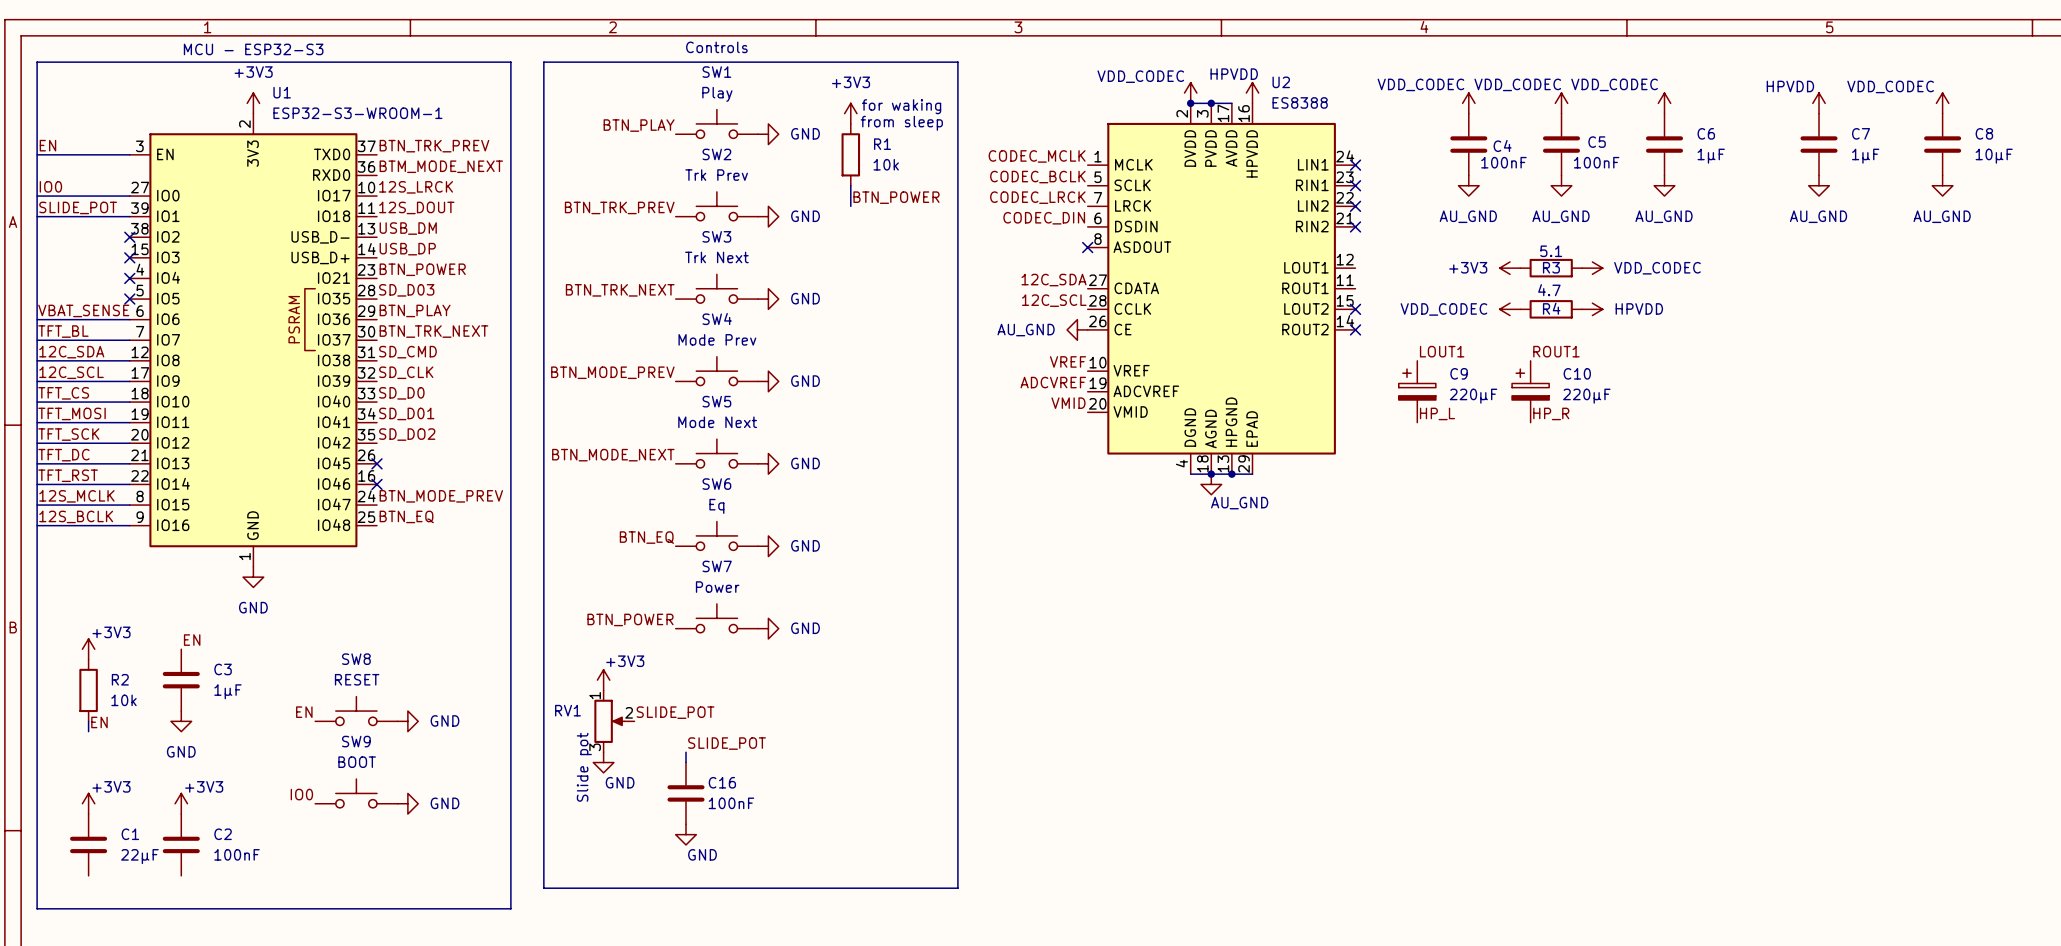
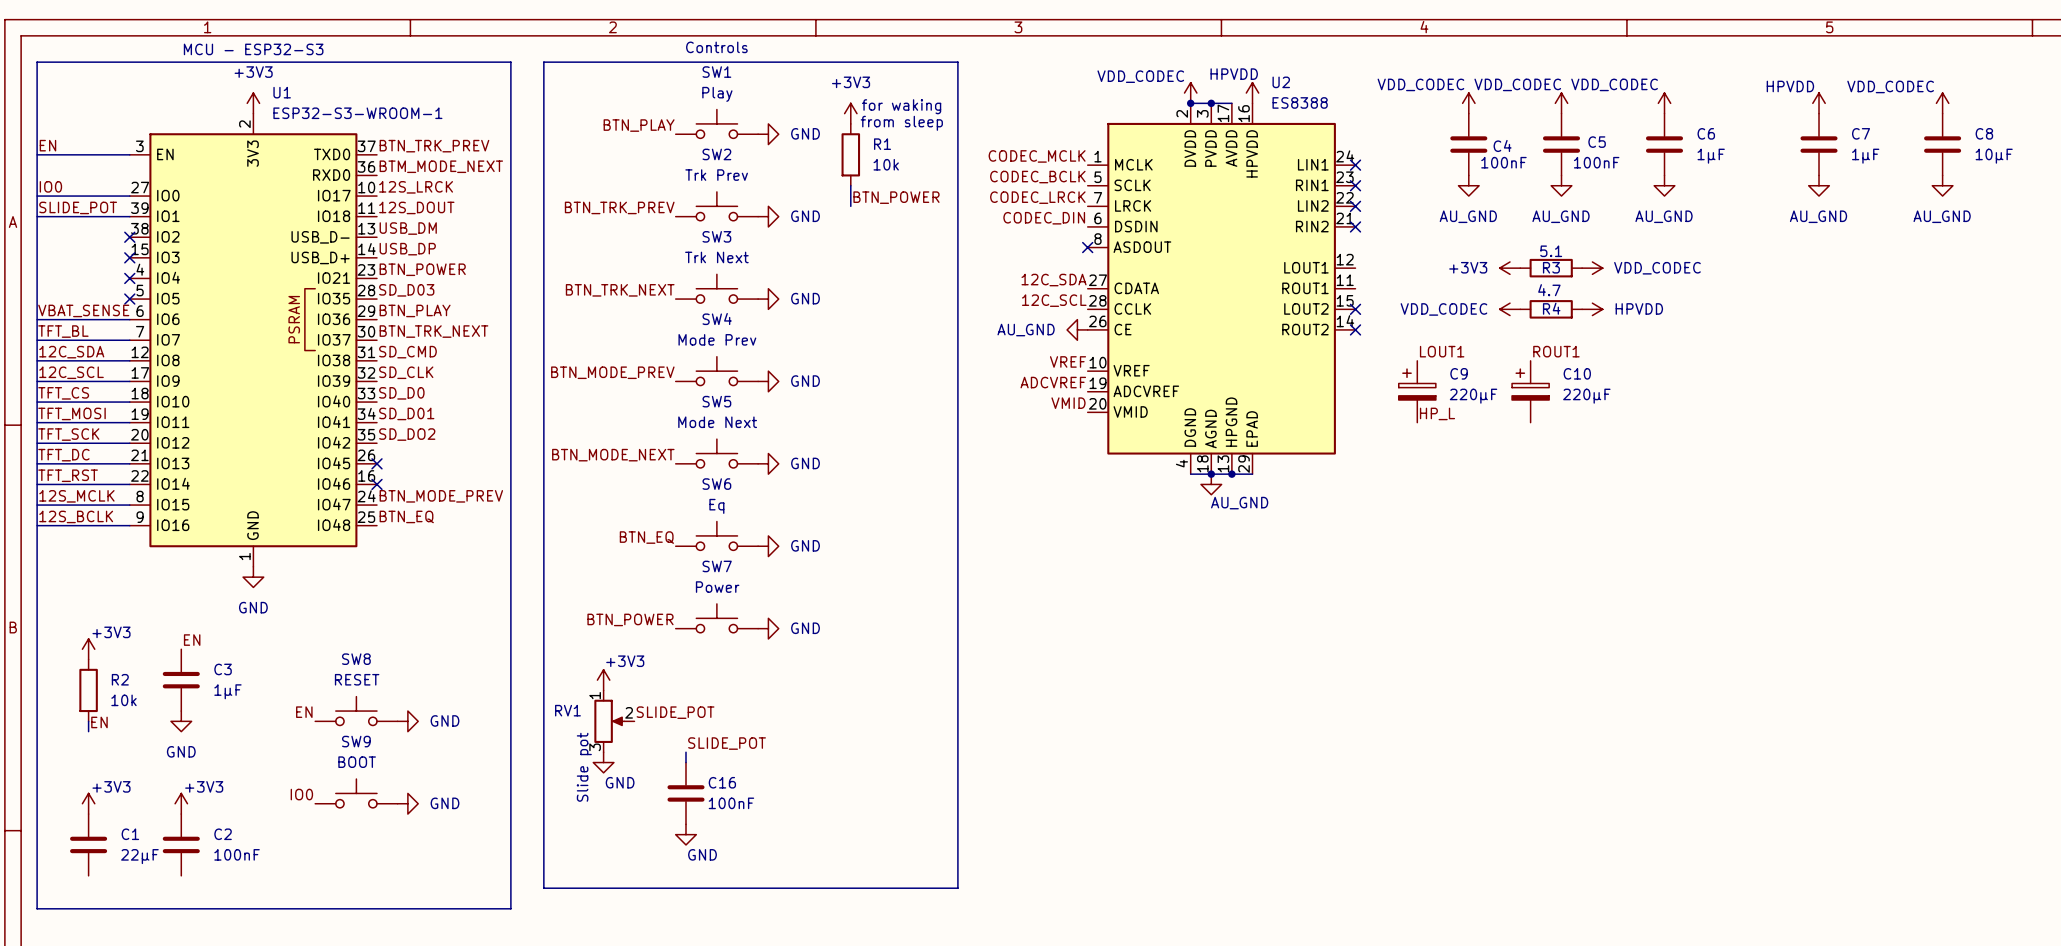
label: HP_R (1551, 413) -> none

